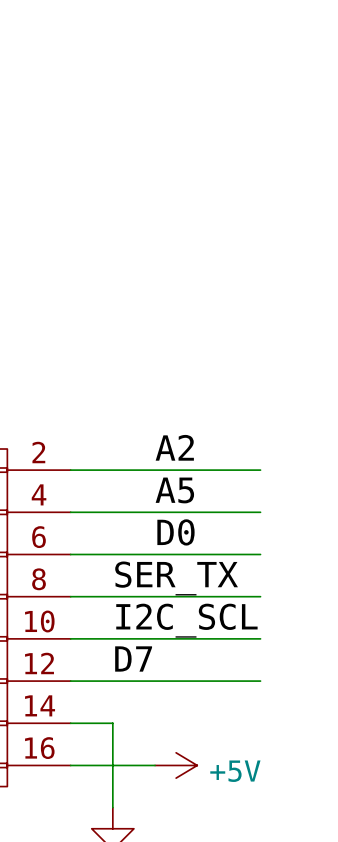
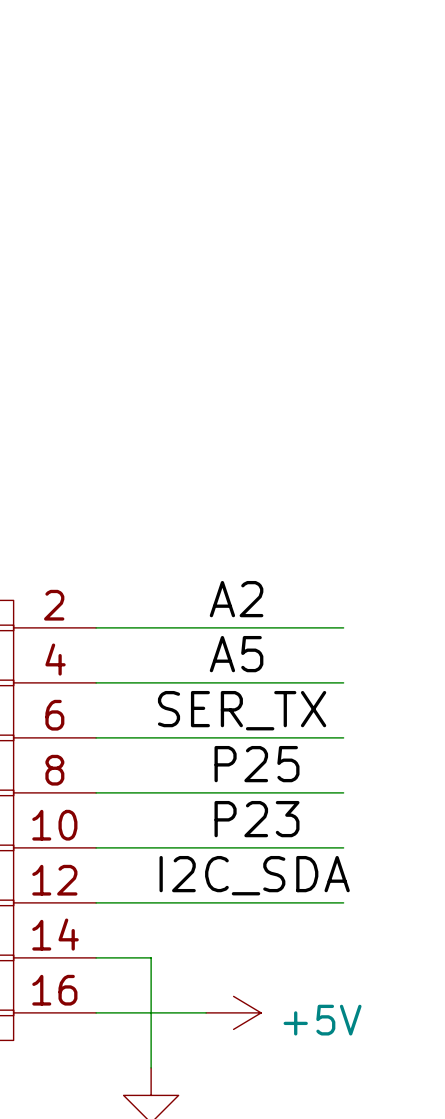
label: D0 (175, 532) -> none
label: none -> P25 (257, 764)
label position: SER_TX (176, 578) -> SER_TX (242, 710)
label: none -> P23 (257, 819)
label: I2C_SCL (186, 620) -> none
label: D7 (133, 658) -> I2C_SDA (254, 875)

